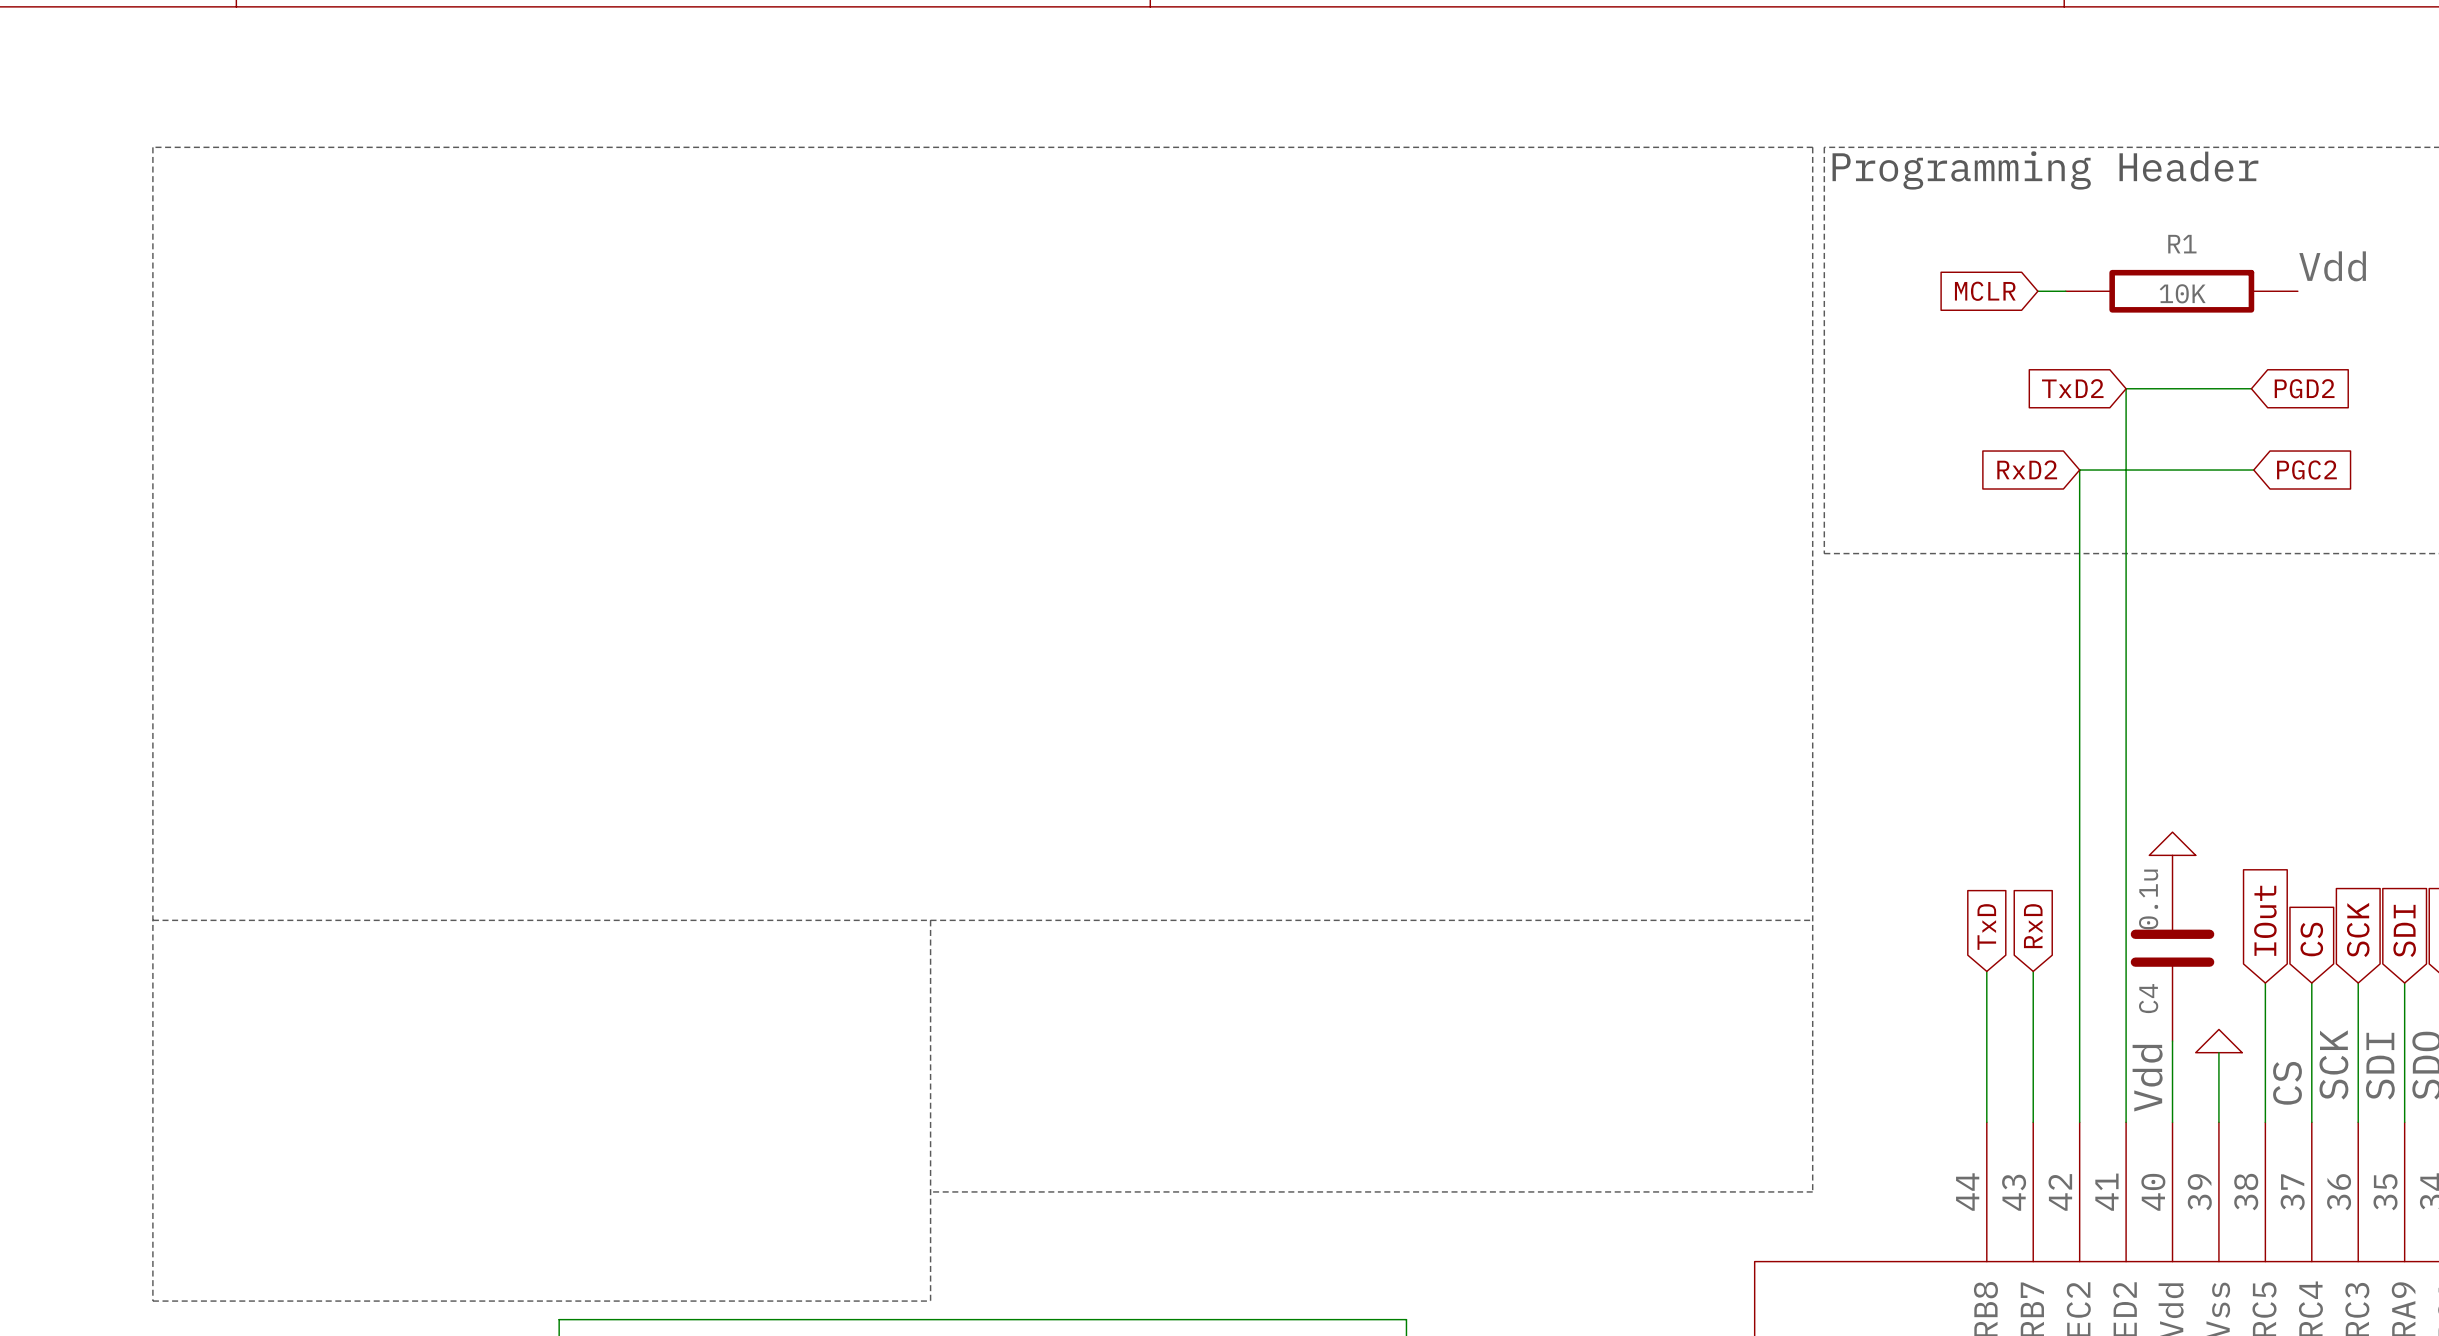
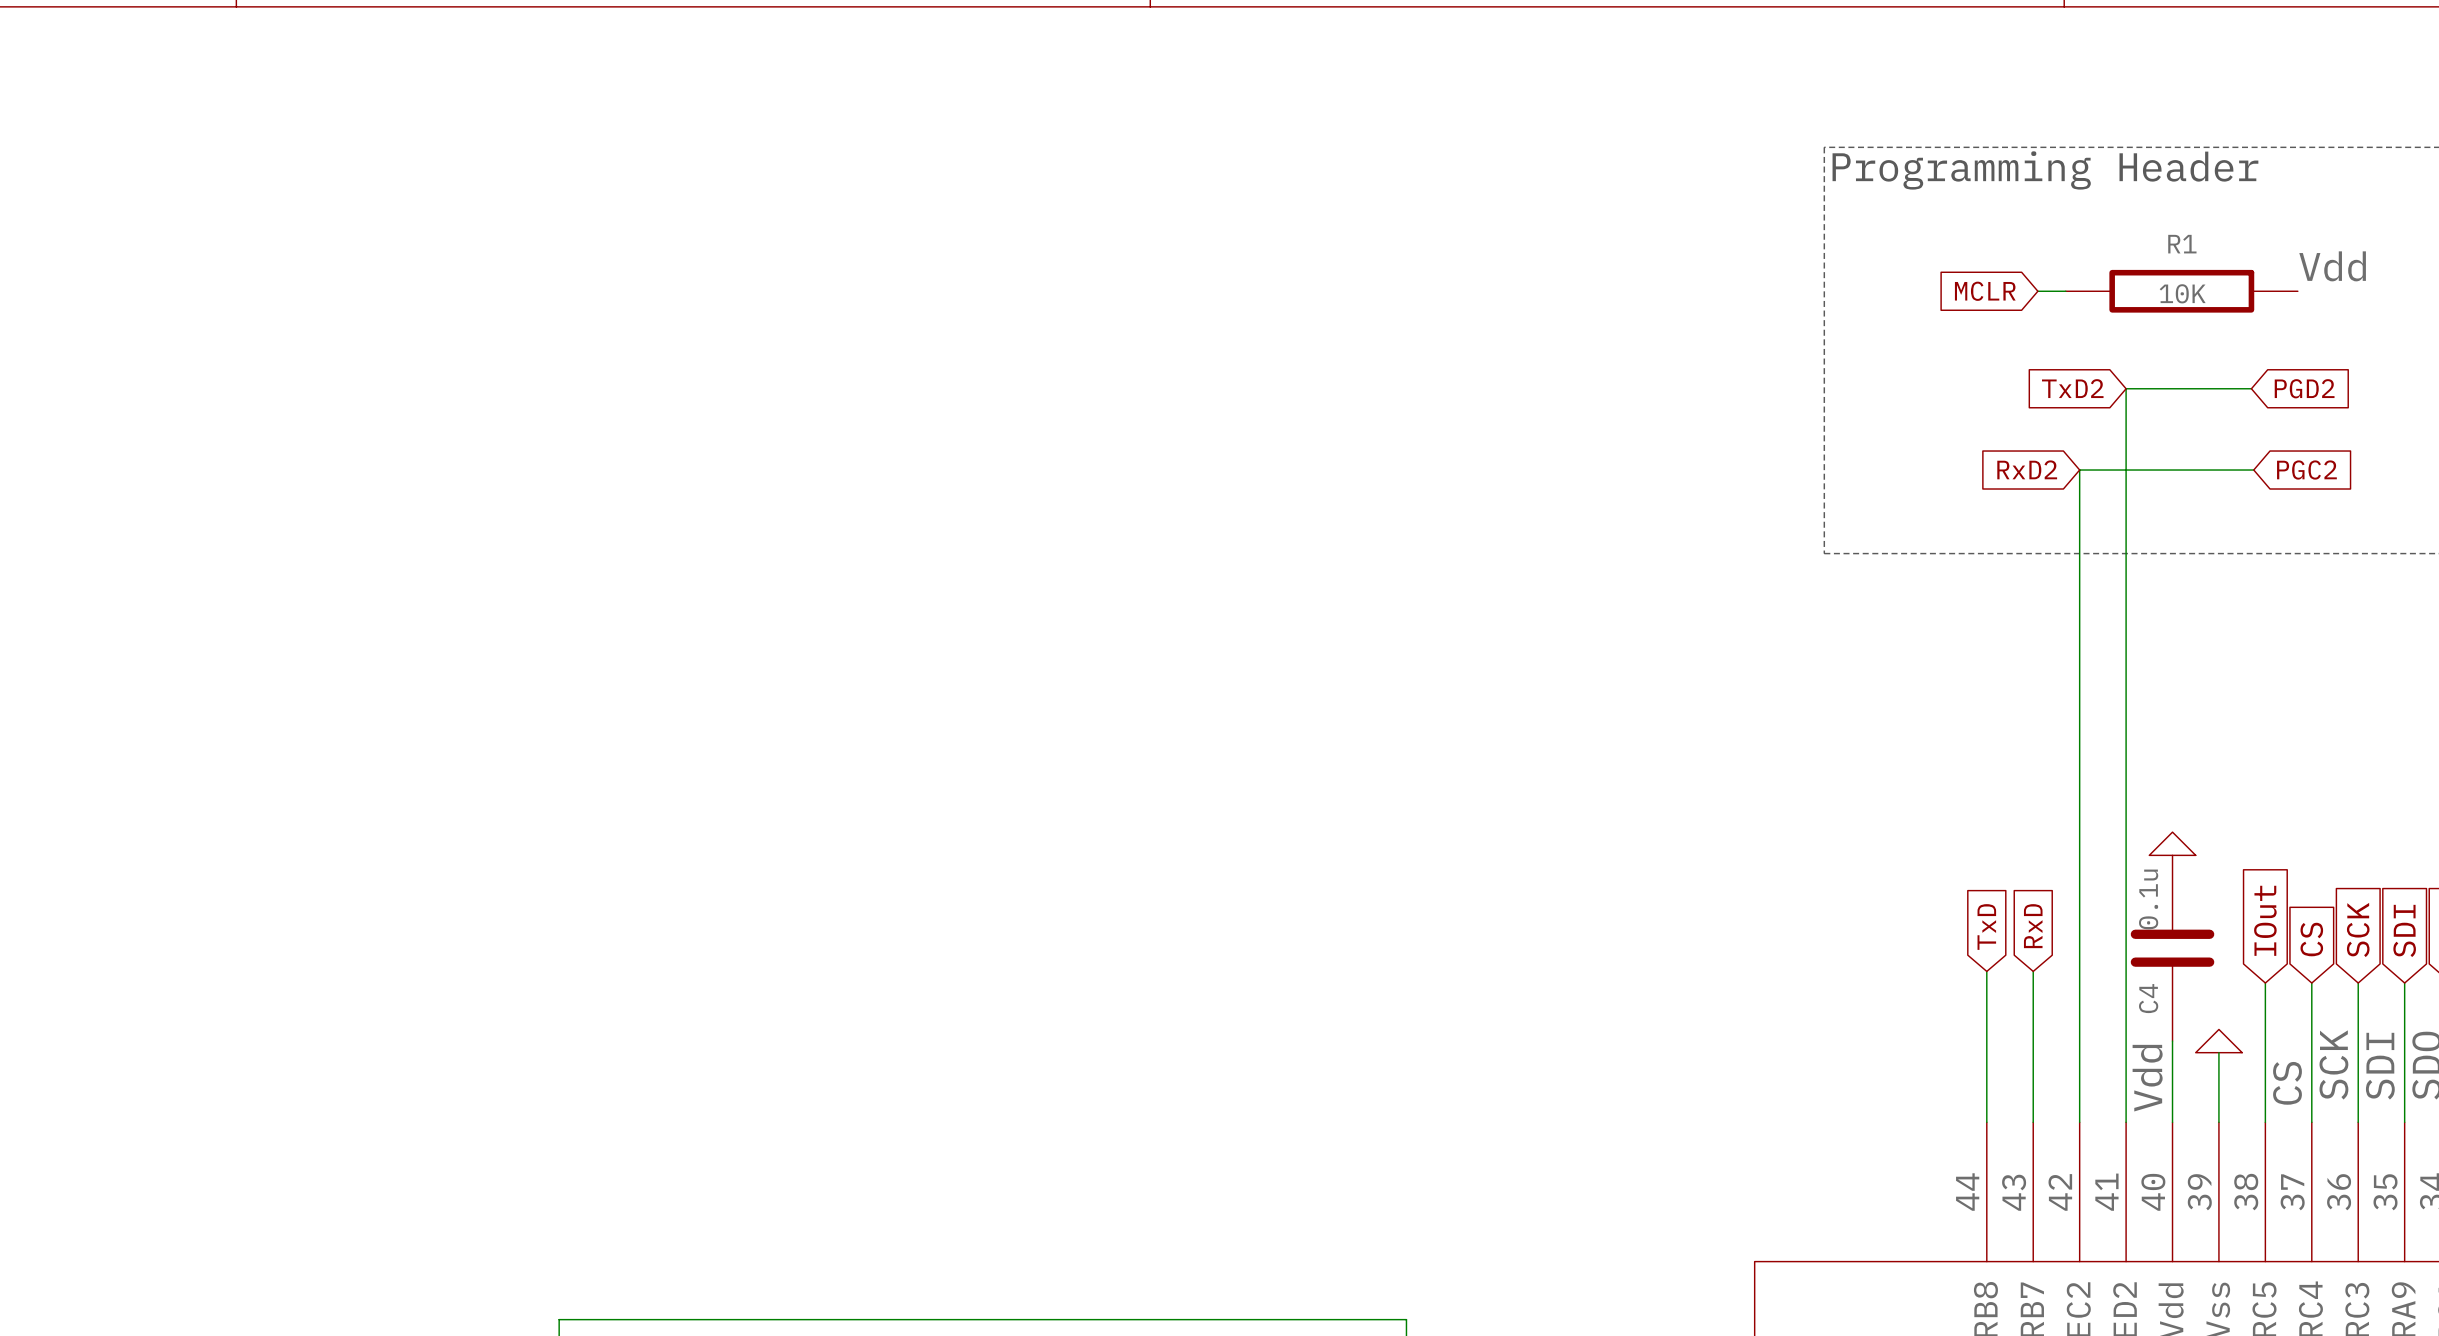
line: (152, 920) (1812, 920) -> none
line: (930, 920) (930, 1301) (152, 1301) (152, 147) (1812, 147) (1812, 1191) (930, 1191) -> none

